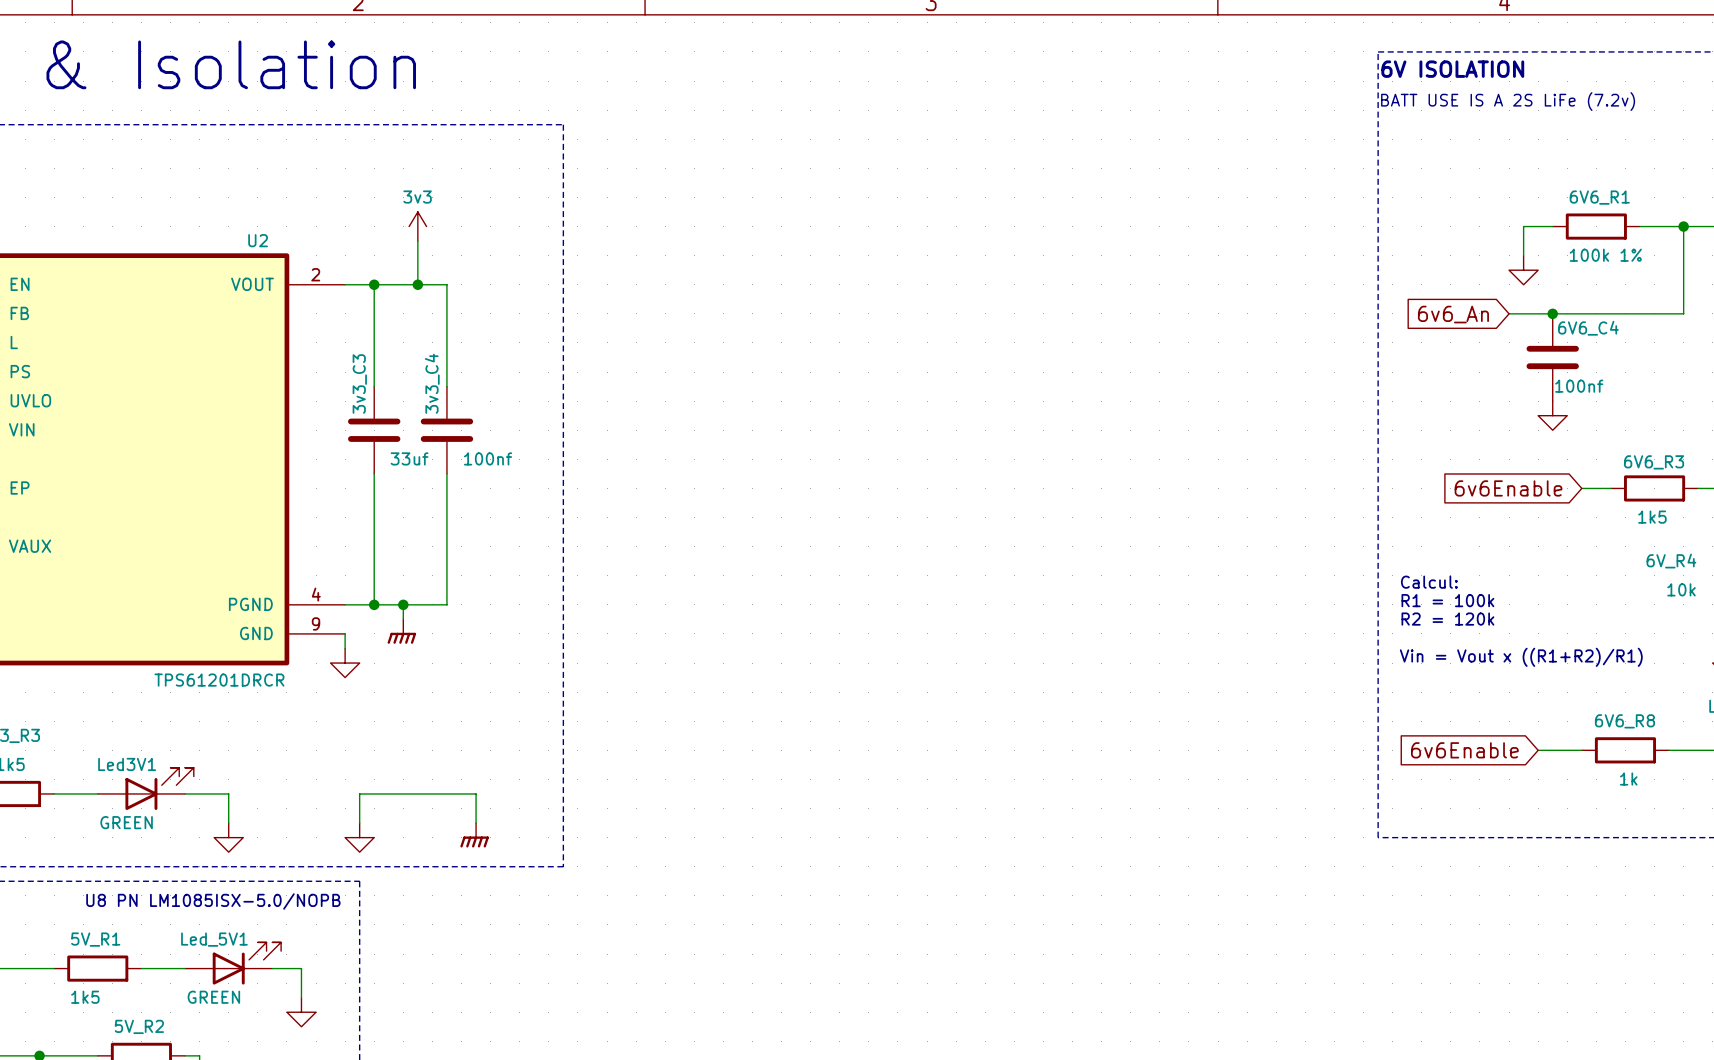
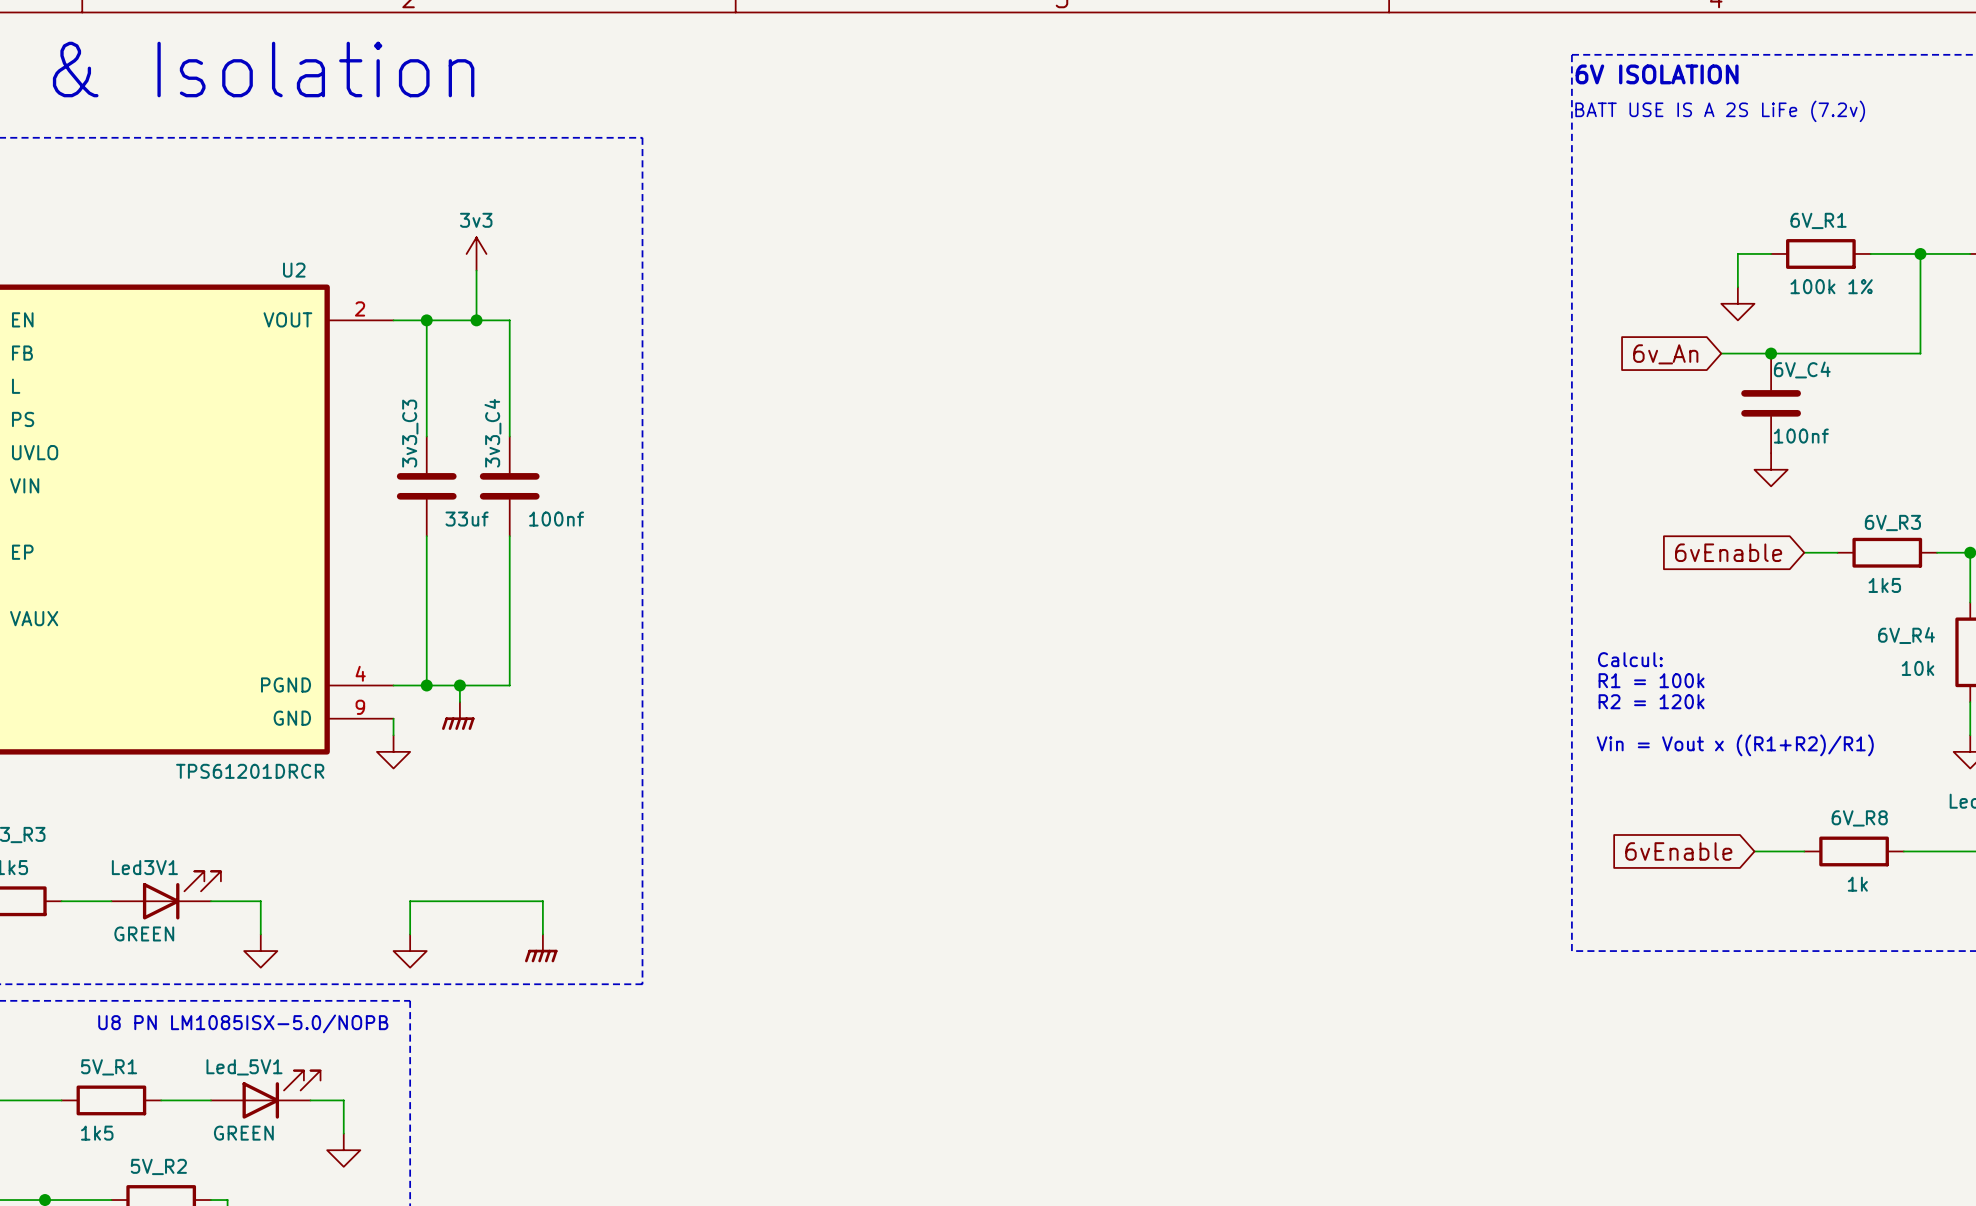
6V6_R1 name: 6V6_R1 (1599, 197) -> 6V_R1 (1818, 220)
global label: 6v6_An (1453, 314) -> 6v_An (1665, 354)
6V6_C4 name: 6V6_C4 (1588, 328) -> 6V_C4 (1802, 369)
6V6_R3 name: 6V6_R3 (1654, 462) -> 6V_R3 (1892, 522)
global label: 6v6Enable (1508, 488) -> 6vEnable (1728, 552)
6V6_R8 name: 6V6_R8 (1624, 721) -> 6V_R8 (1859, 818)
global label: 6v6Enable (1464, 750) -> 6vEnable (1678, 851)

